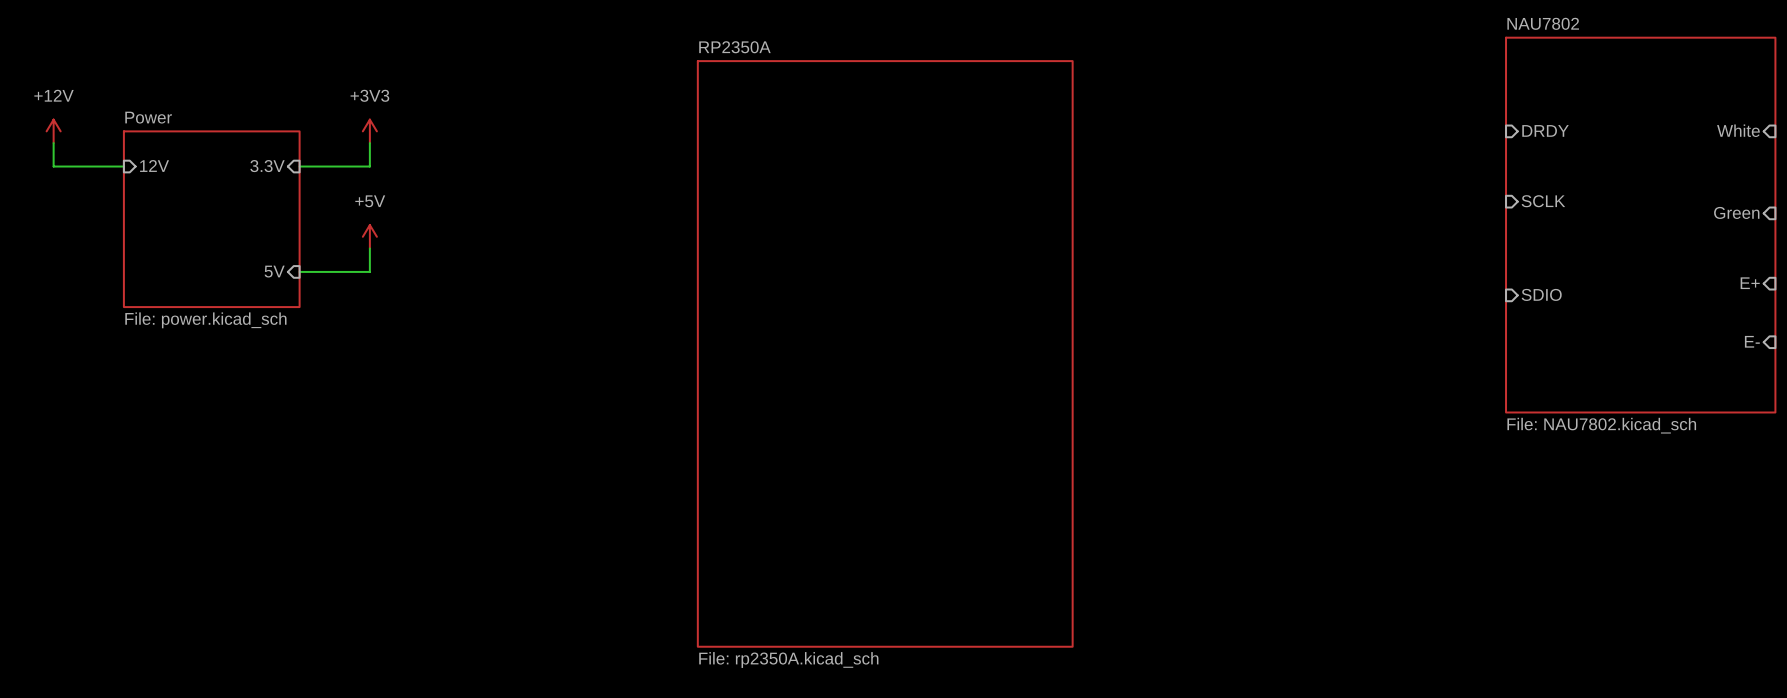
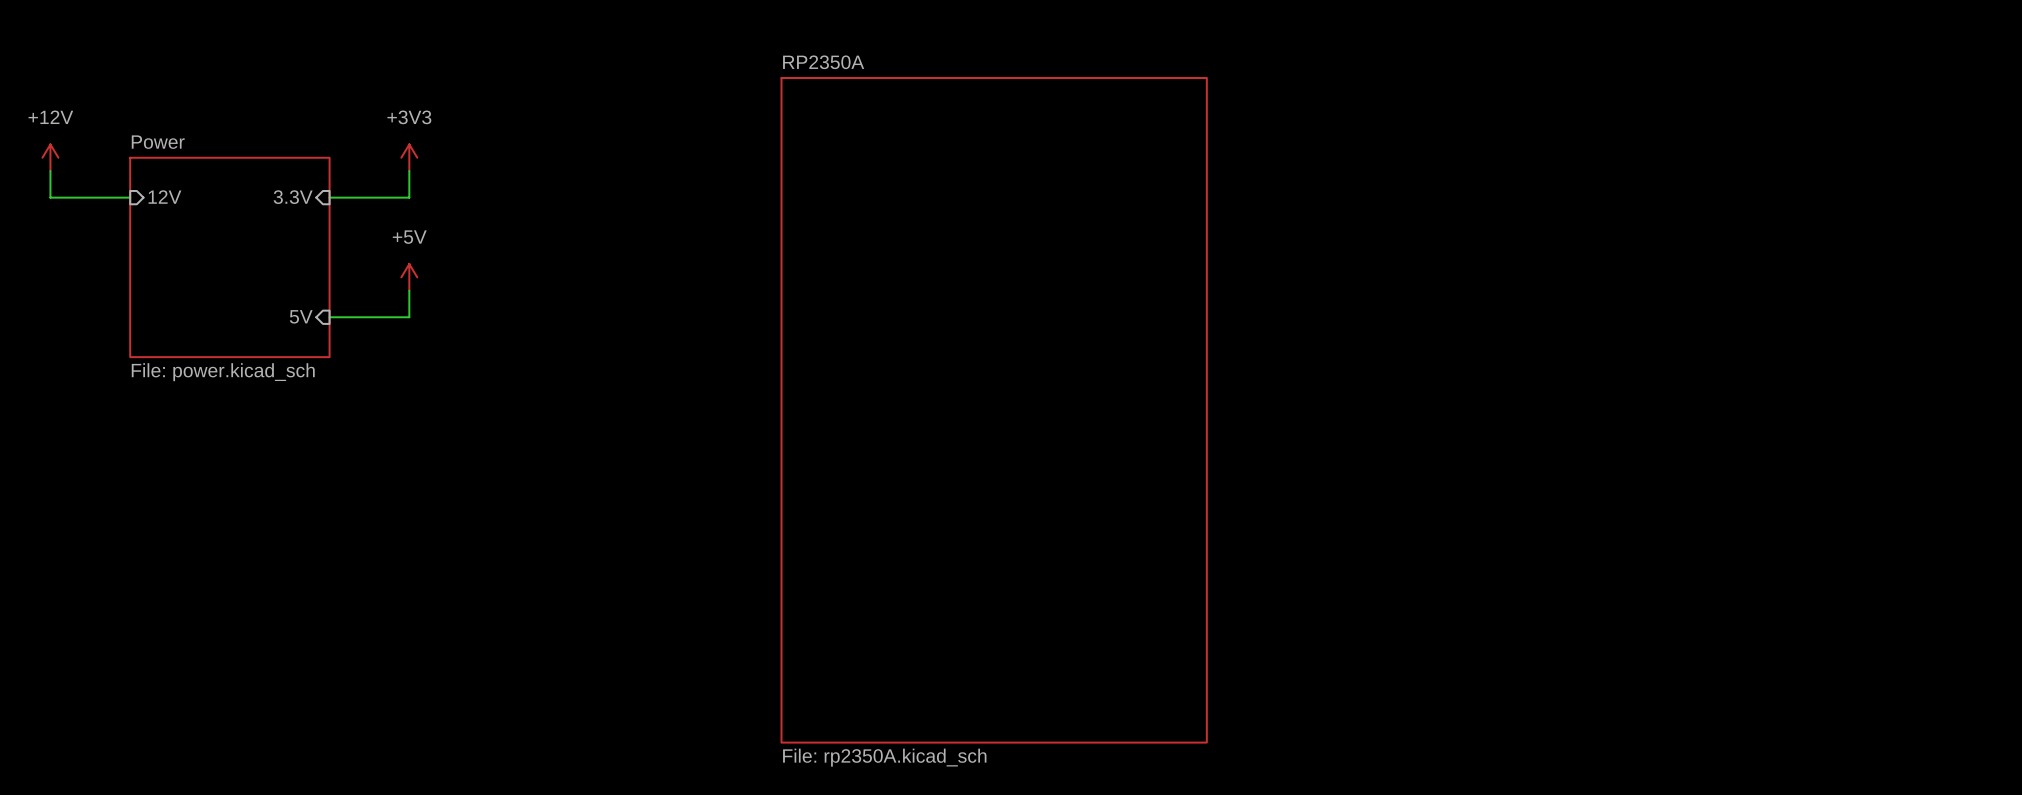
sheet pin: DRDY (1545, 130) -> none
sheet pin: White (1738, 130) -> none
sheet pin: SCLK (1543, 201) -> none
sheet pin: Green (1736, 212) -> none
sheet NAU7802: File: NAU7802.kicad_sch (1640, 225) -> none
sheet pin: E+ (1750, 283) -> none
sheet pin: SDIO (1541, 294) -> none
sheet pin: E- (1752, 341) -> none

